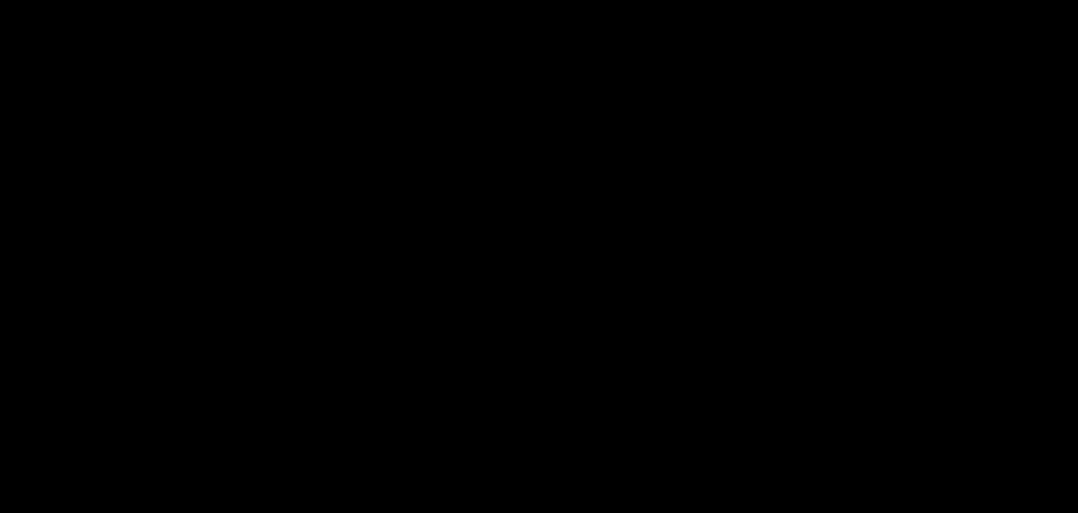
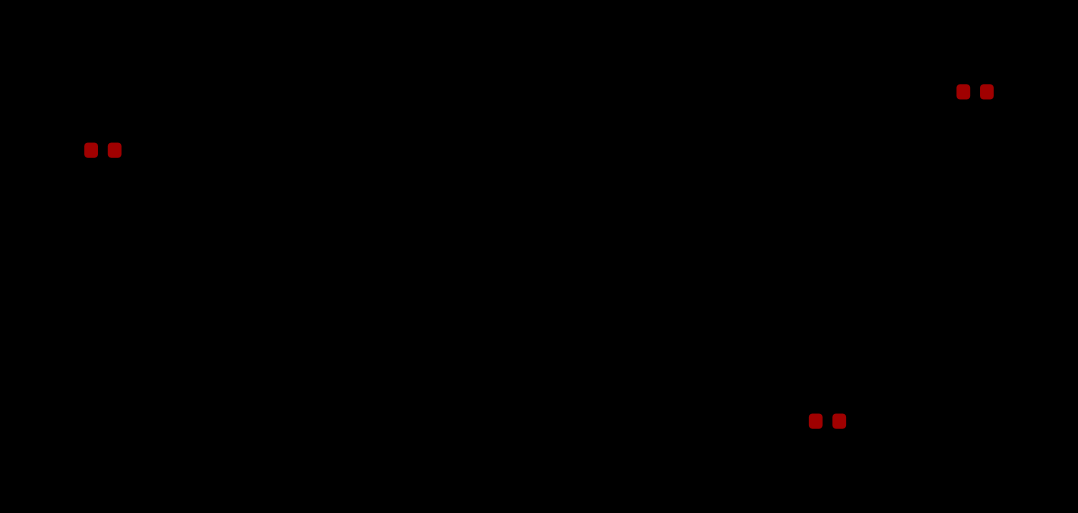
part: none -> (975, 91)
part: none -> (102, 150)
part: none -> (827, 421)

